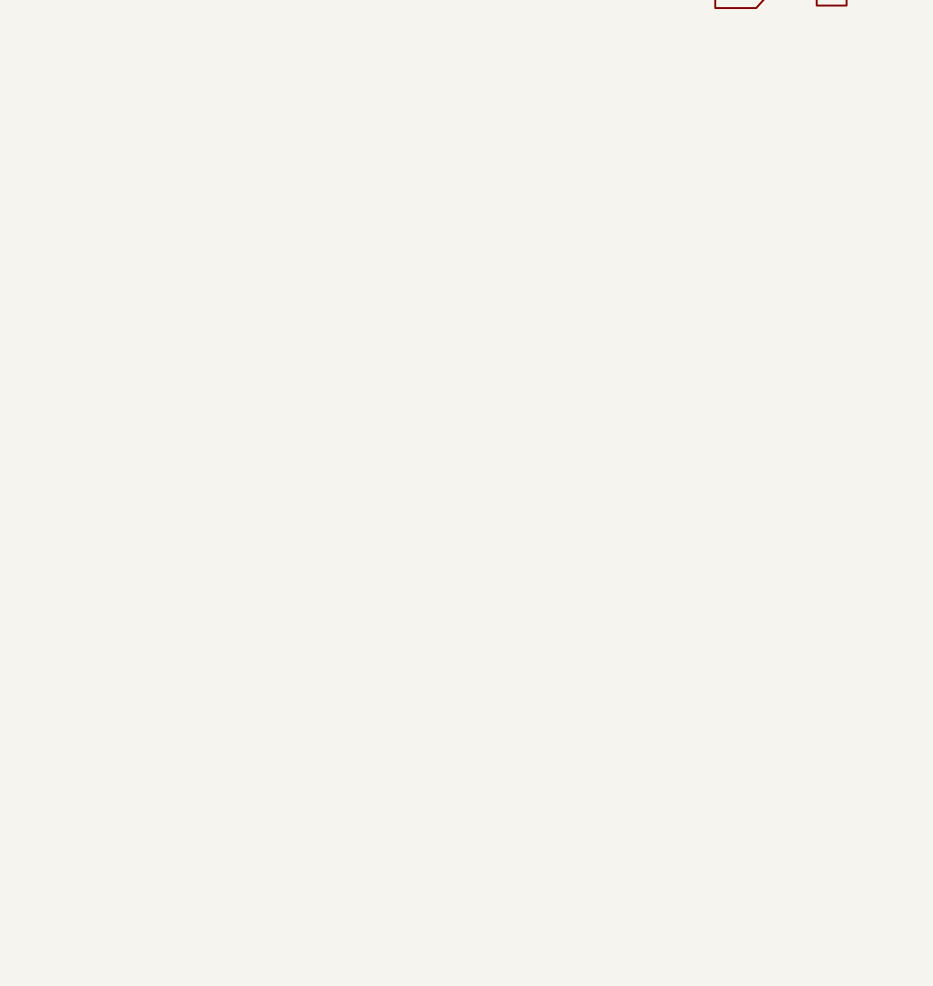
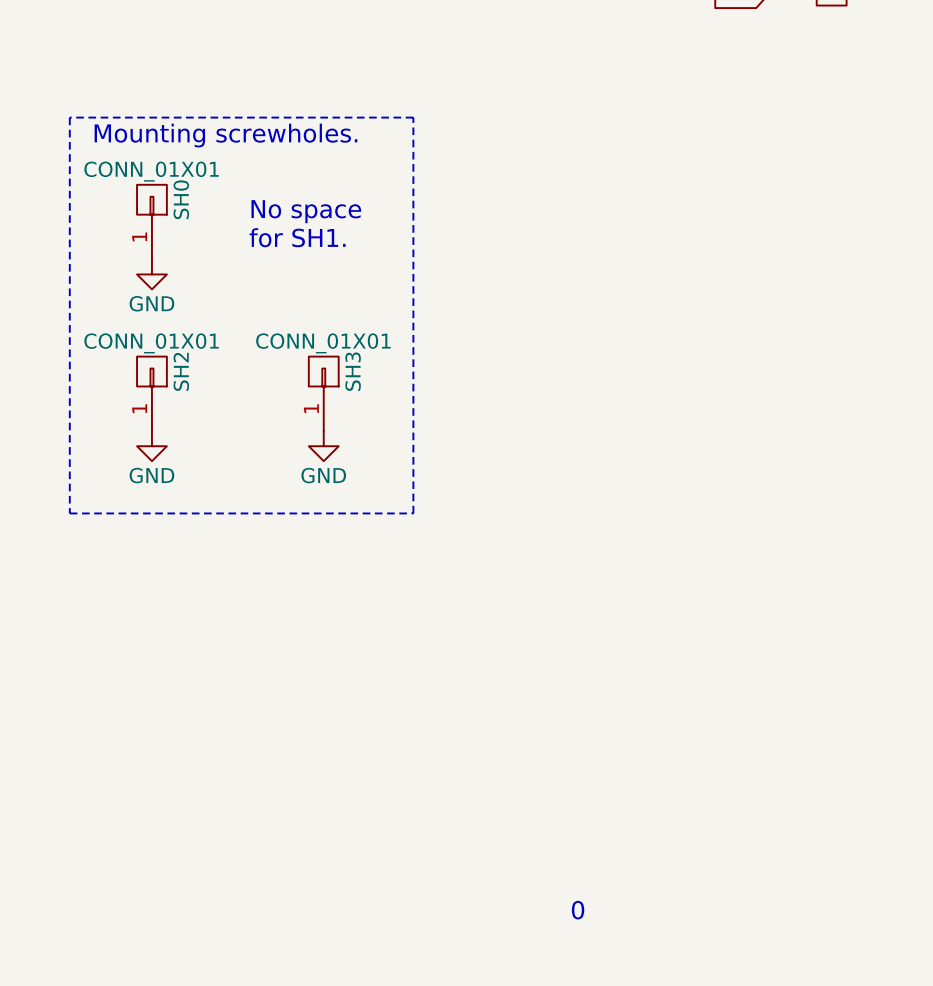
line: none -> (69, 117) (69, 513) (413, 513) (413, 117) (69, 117)
text: none -> Mounting screwholes. (225, 135)
text: none -> No space (306, 211)
SH0: none -> CONN_01X01 (151, 222)
text: none -> for SH1. (297, 237)
power symbol: none -> GND (151, 274)
SH2: none -> CONN_01X01 (151, 393)
SH3: none -> CONN_01X01 (323, 393)
power symbol: none -> GND (151, 446)
power symbol: none -> GND (323, 446)
text: none -> 0 (578, 910)

